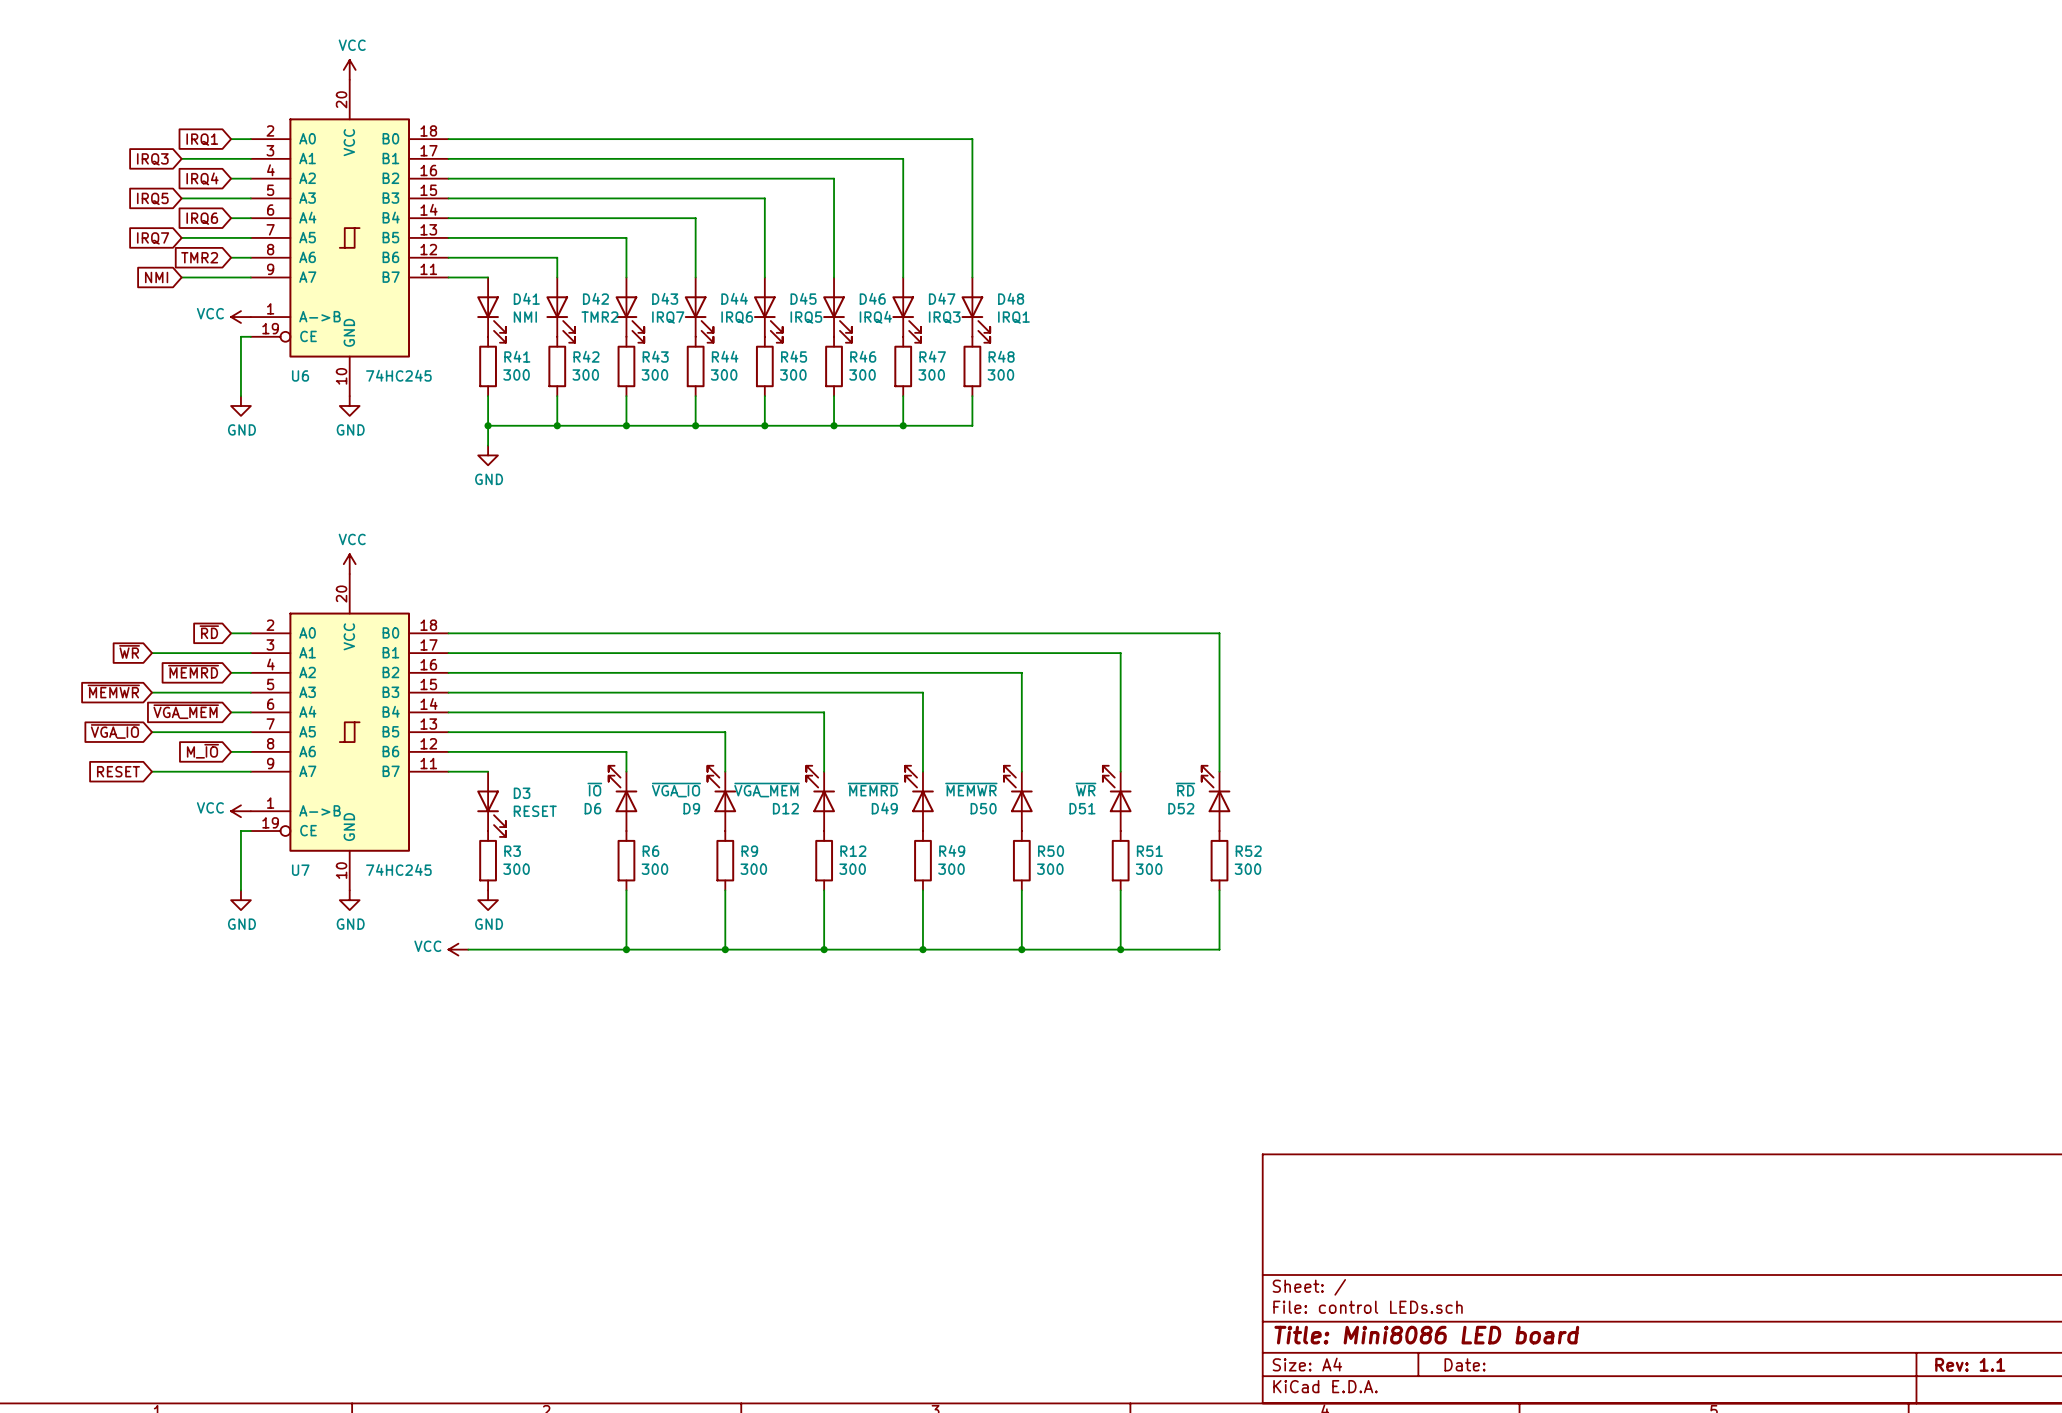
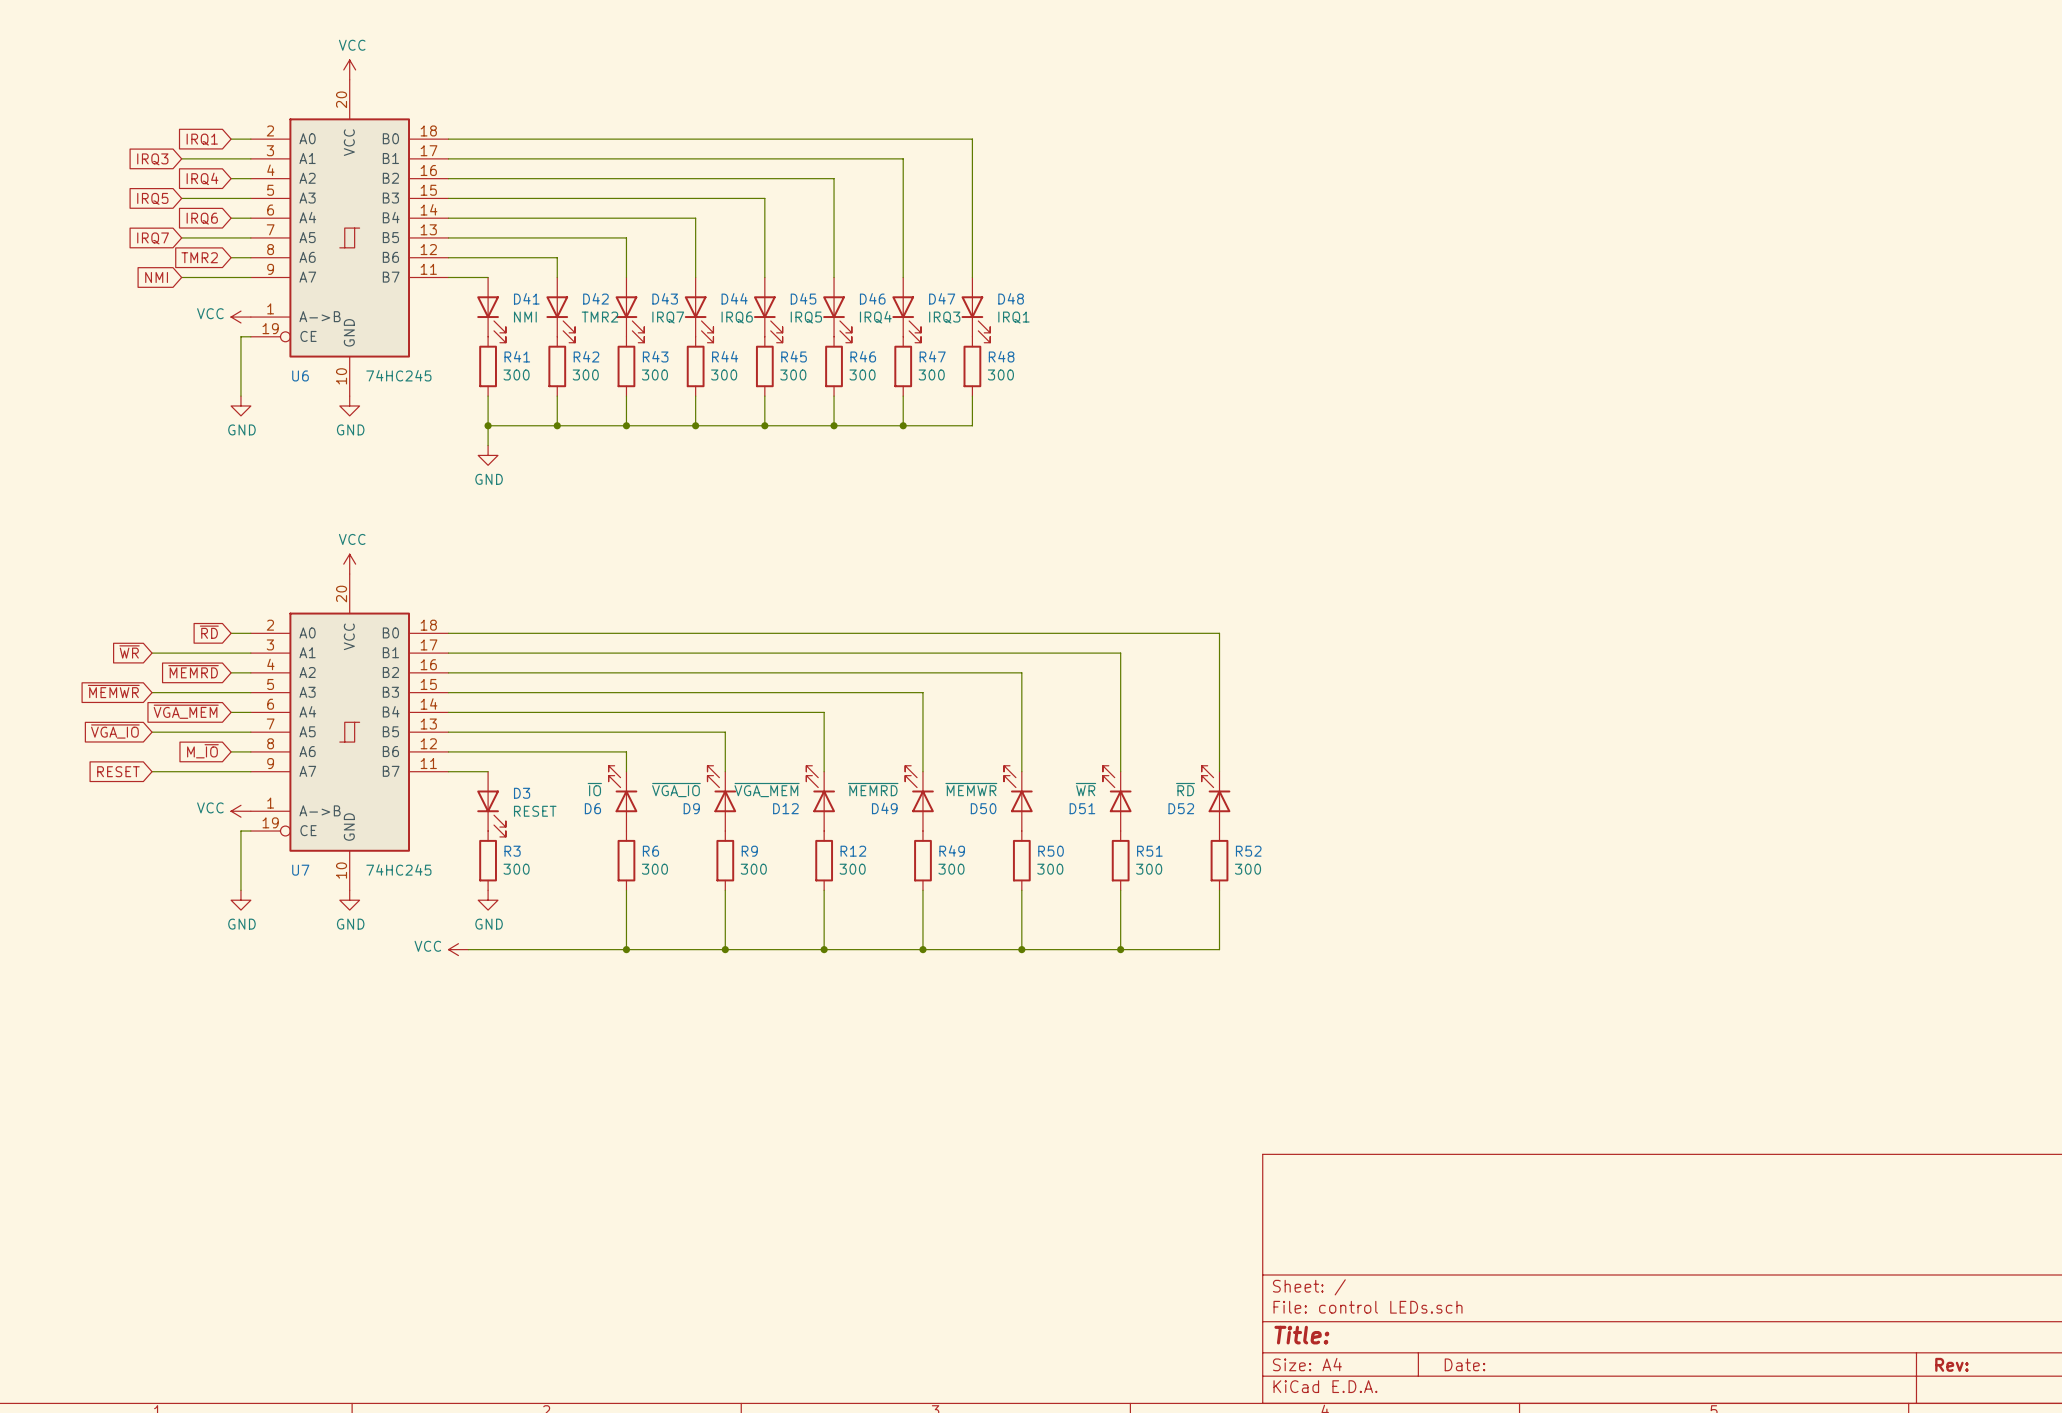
title block: Title: Mini8086 LED board (1426, 1335) -> Title: (1301, 1335)
title block: Rev: 1.1 (1970, 1364) -> Rev: (1951, 1364)

